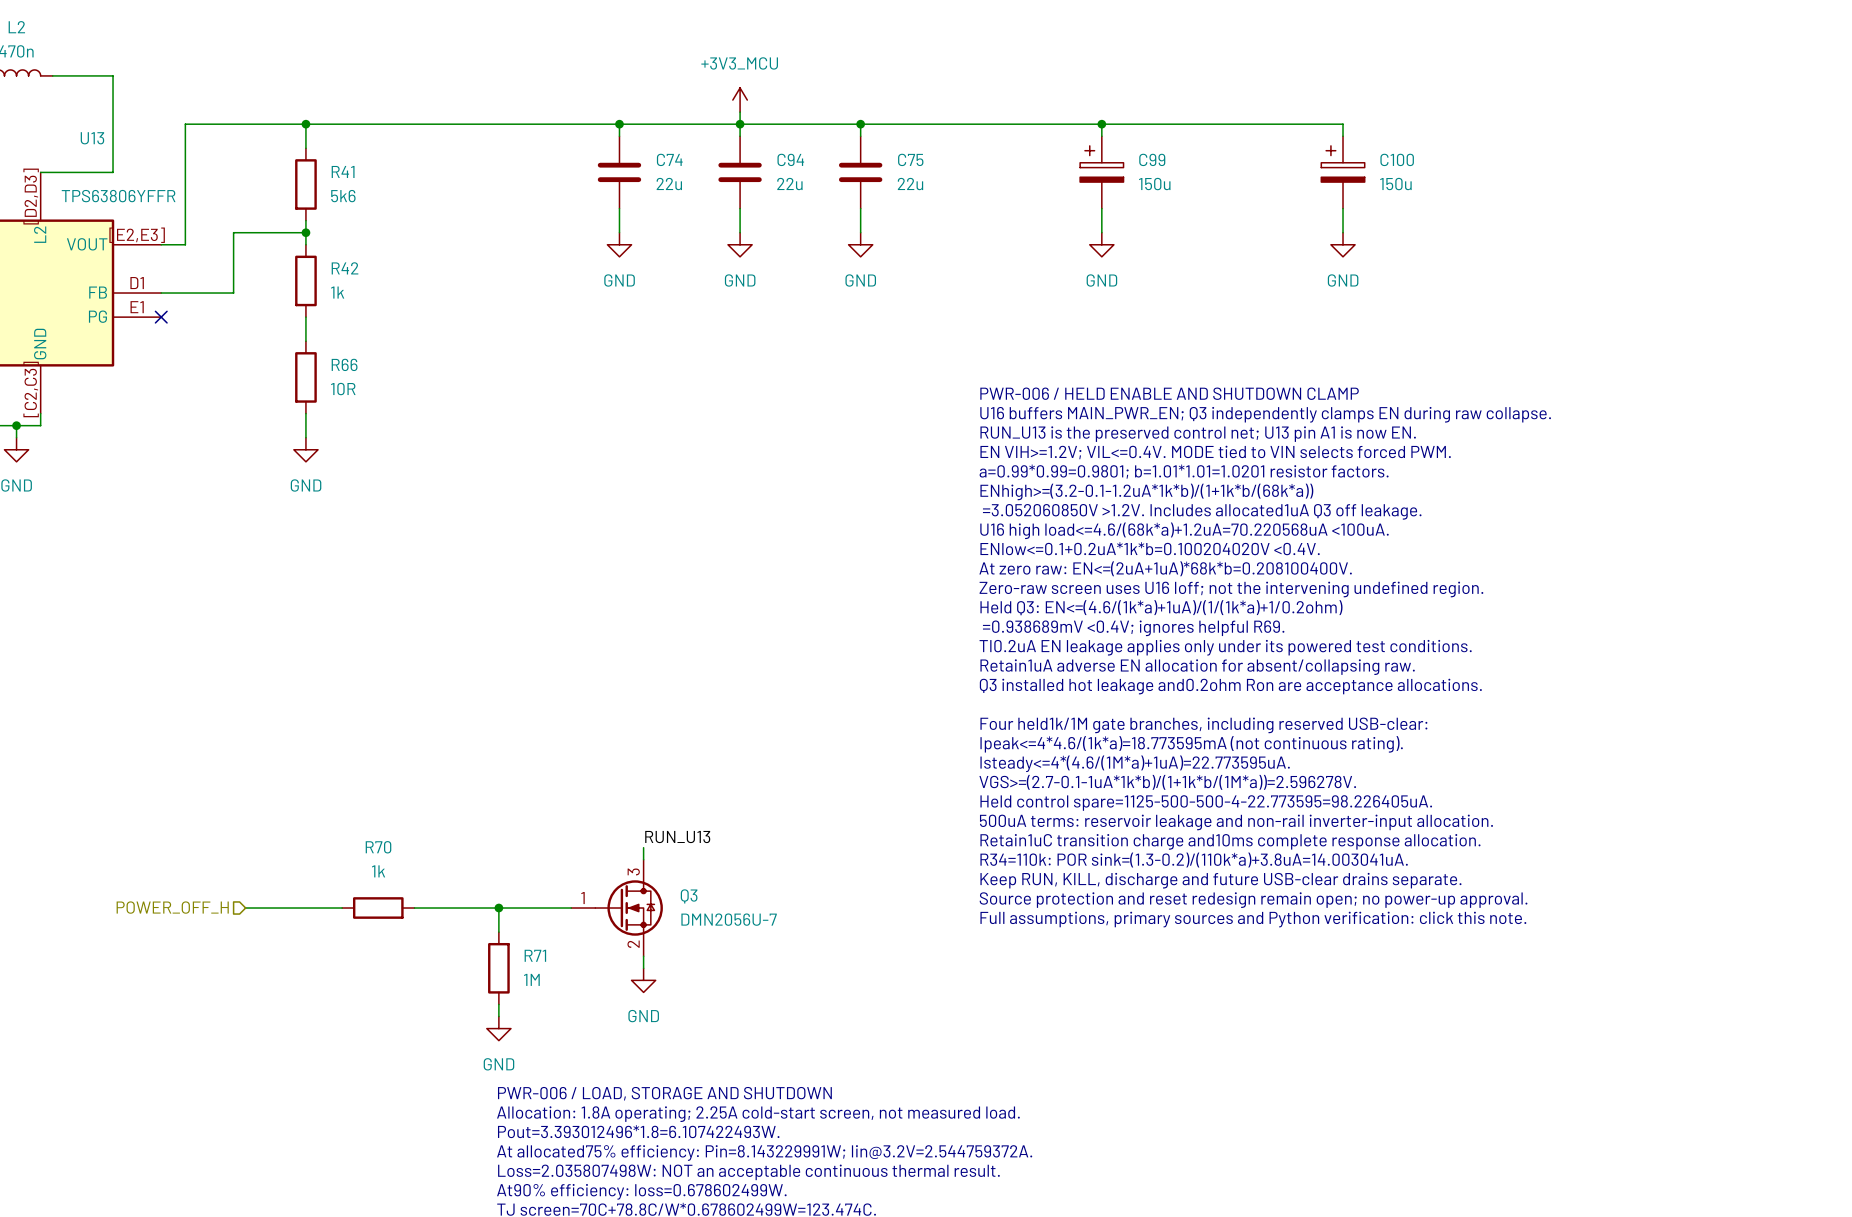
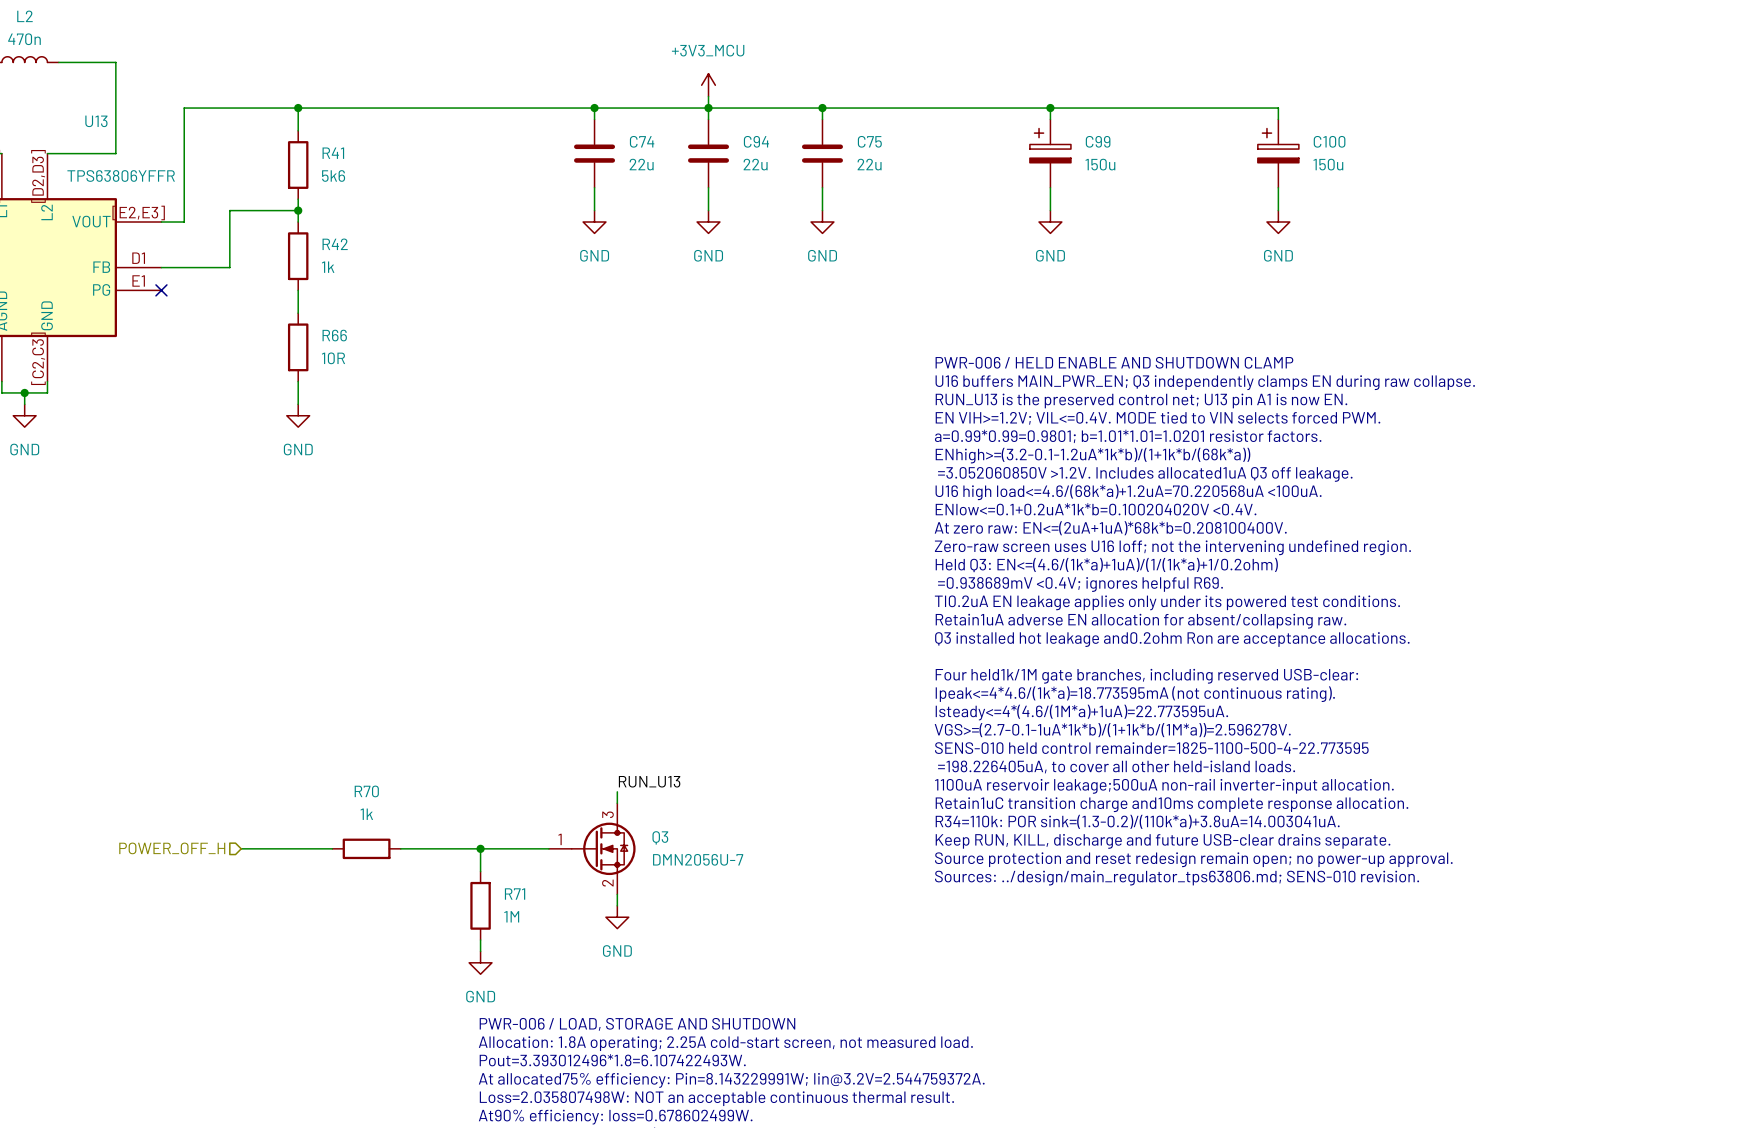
text: Held control spare=1125-500-500-4-22.773595=98.226405uA. (1206, 803) -> SENS-010 held control remainder=1825-1100-500-4-22.773595 (1151, 748)
text: 500uA terms: reservoir leakage and non-rail inverter-input allocation. (1236, 822) -> =198.226405uA, to cover all other held-island loads. (1116, 767)
text: Retain1uC transition charge and10ms complete response allocation. (1230, 841) -> 1100uA reservoir leakage;500uA non-rail inverter-input allocation. (1164, 786)
text: R34=110k: POR sink=(1.3-0.2)/(110k*a)+3.8uA=14.003041uA. (1194, 860) -> Retain1uC transition charge and10ms complete response allocation. (1172, 804)
text: Keep RUN, KILL, discharge and future USB-clear drains separate. (1220, 880) -> R34=110k: POR sink=(1.3-0.2)/(110k*a)+3.8uA=14.003041uA. (1137, 821)
text: Source protection and reset redesign remain open; no power-up approval. (1253, 900) -> Keep RUN, KILL, discharge and future USB-clear drains separate. (1163, 841)
text: Full assumptions, primary sources and Python verification: click this note. (1253, 919) -> Source protection and reset redesign remain open; no power-up approval. (1193, 859)
text: none -> Sources: ../design/main_regulator_tps63806.md; SENS-010 revision. (1177, 878)

